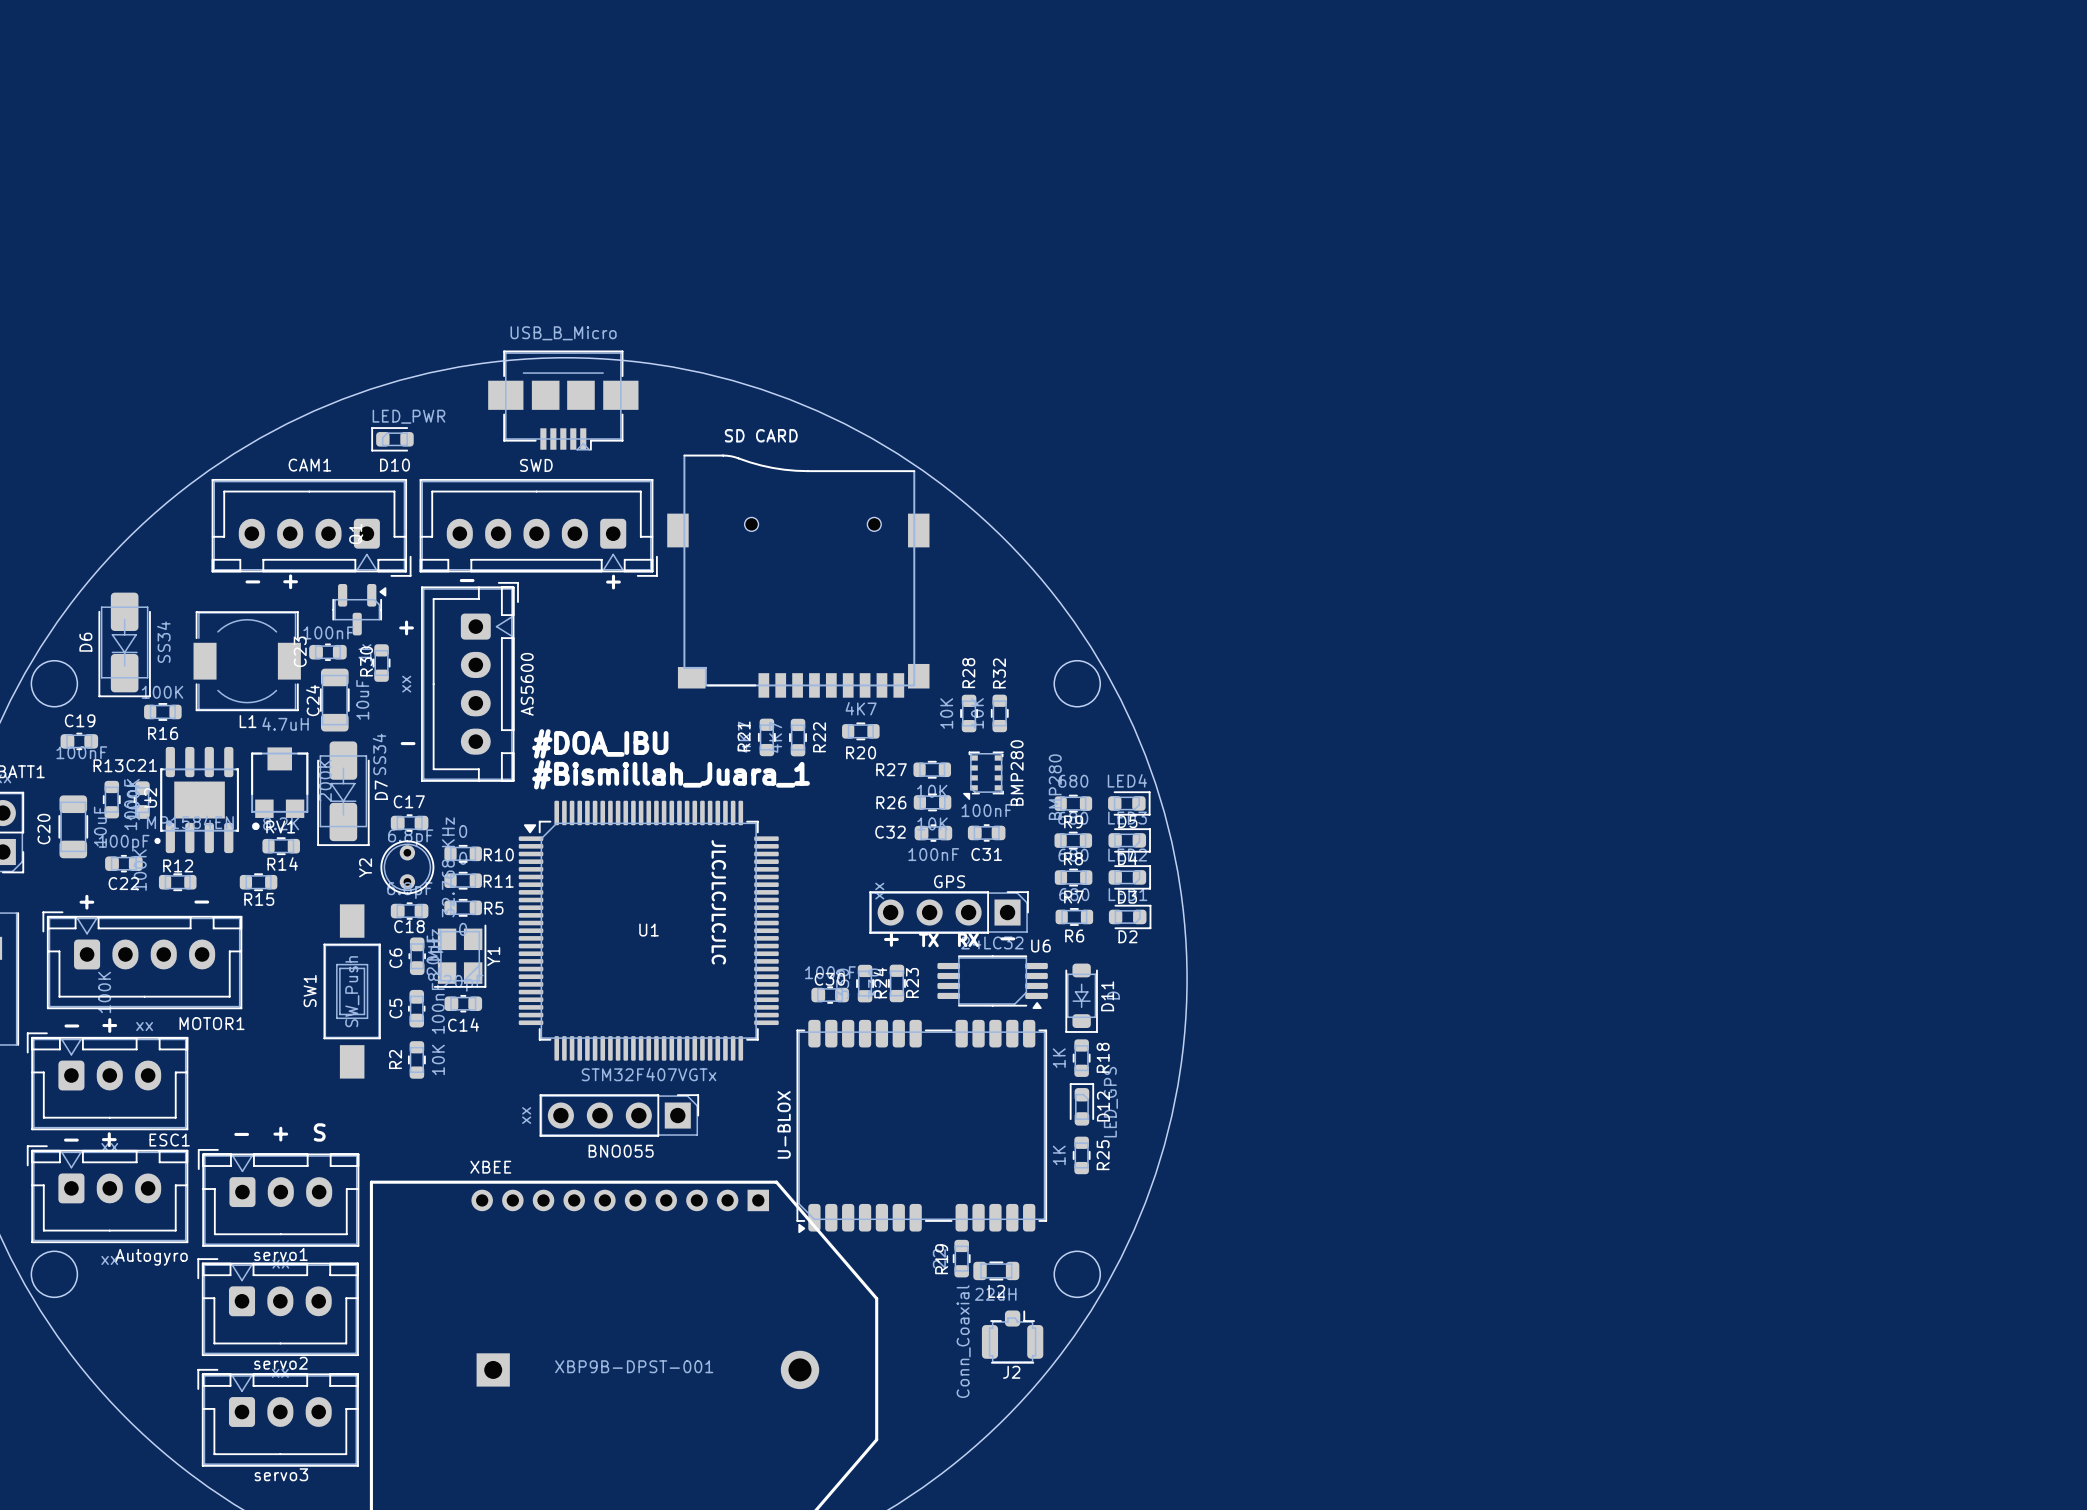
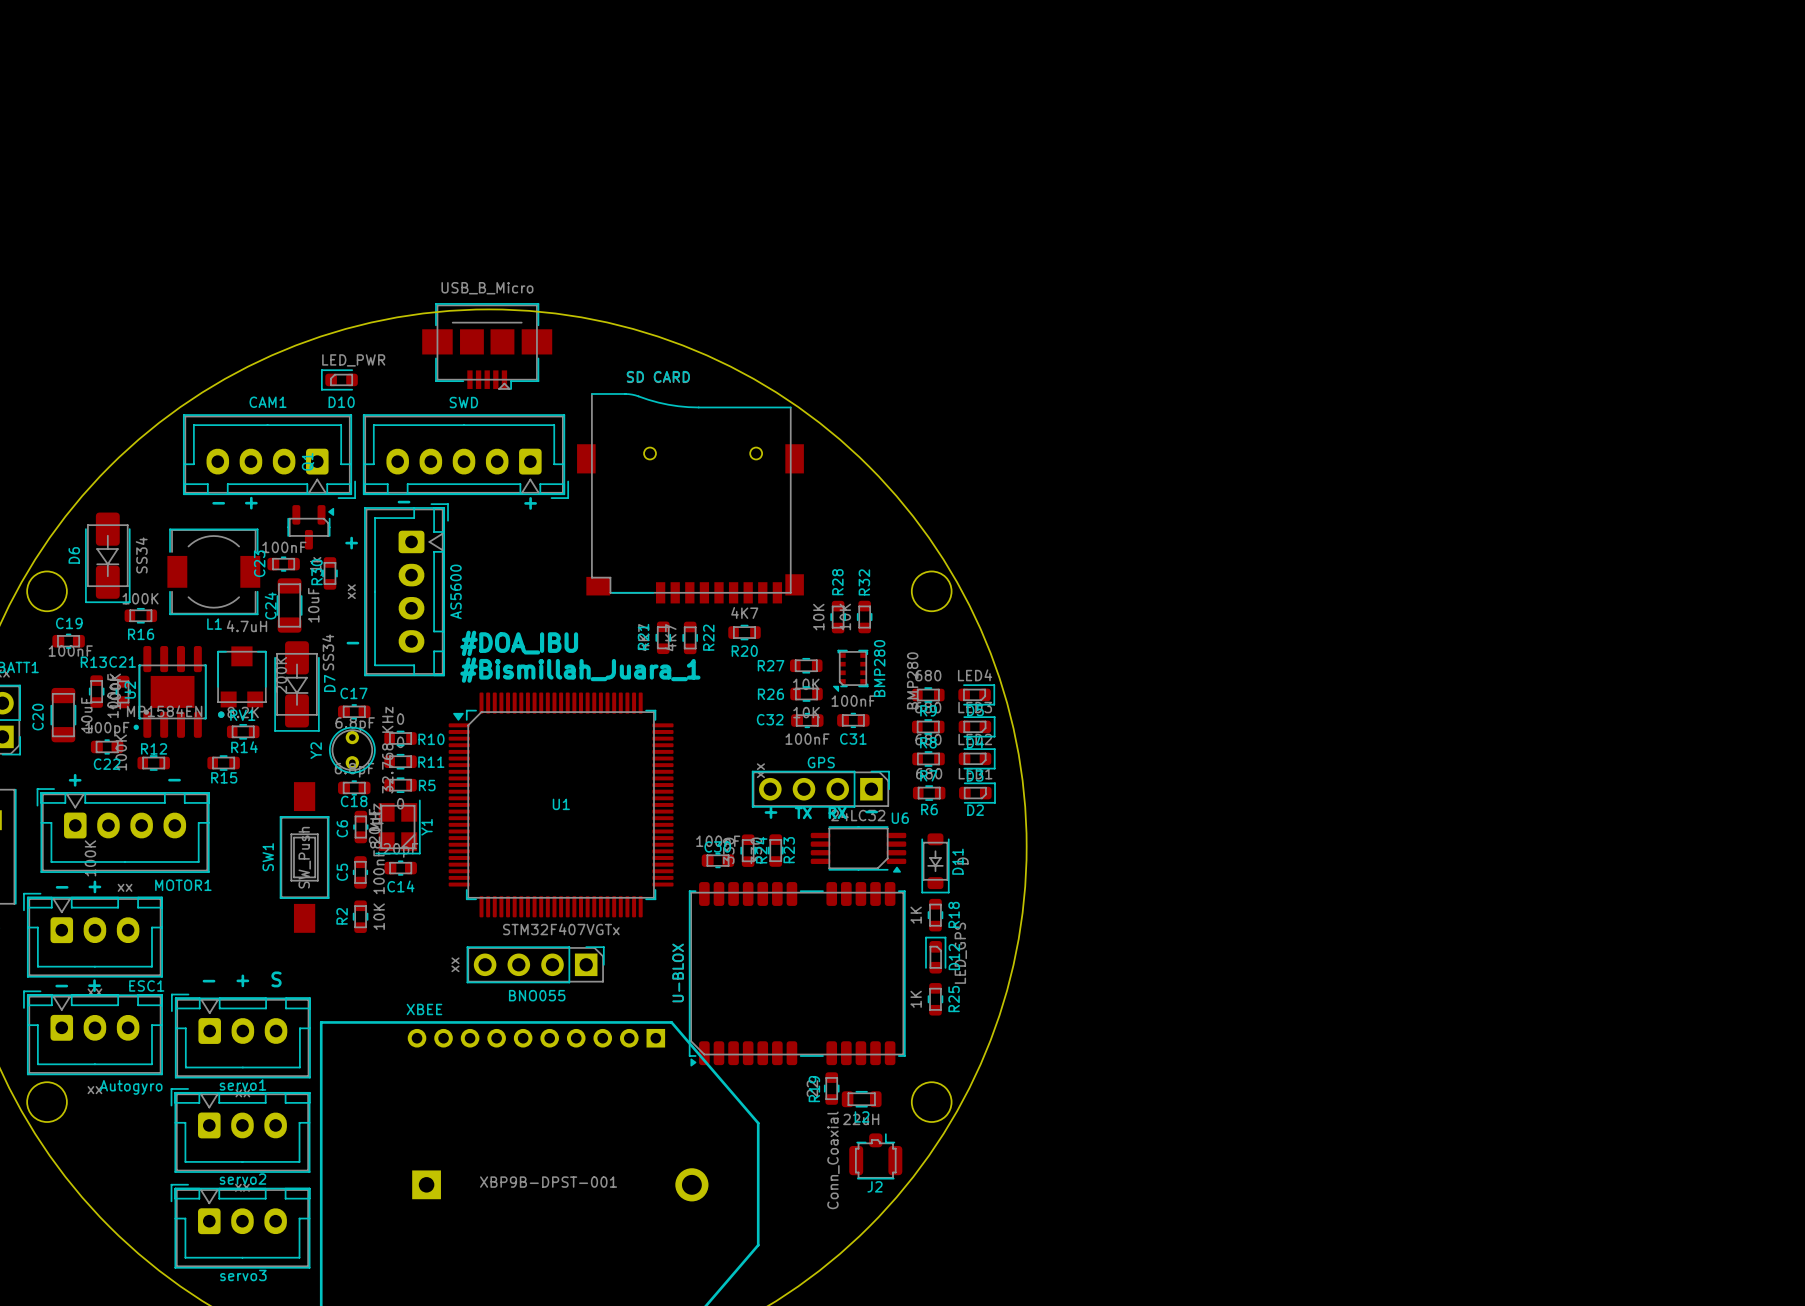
text: JLCJLCJLCJLC (718, 902) -> none

